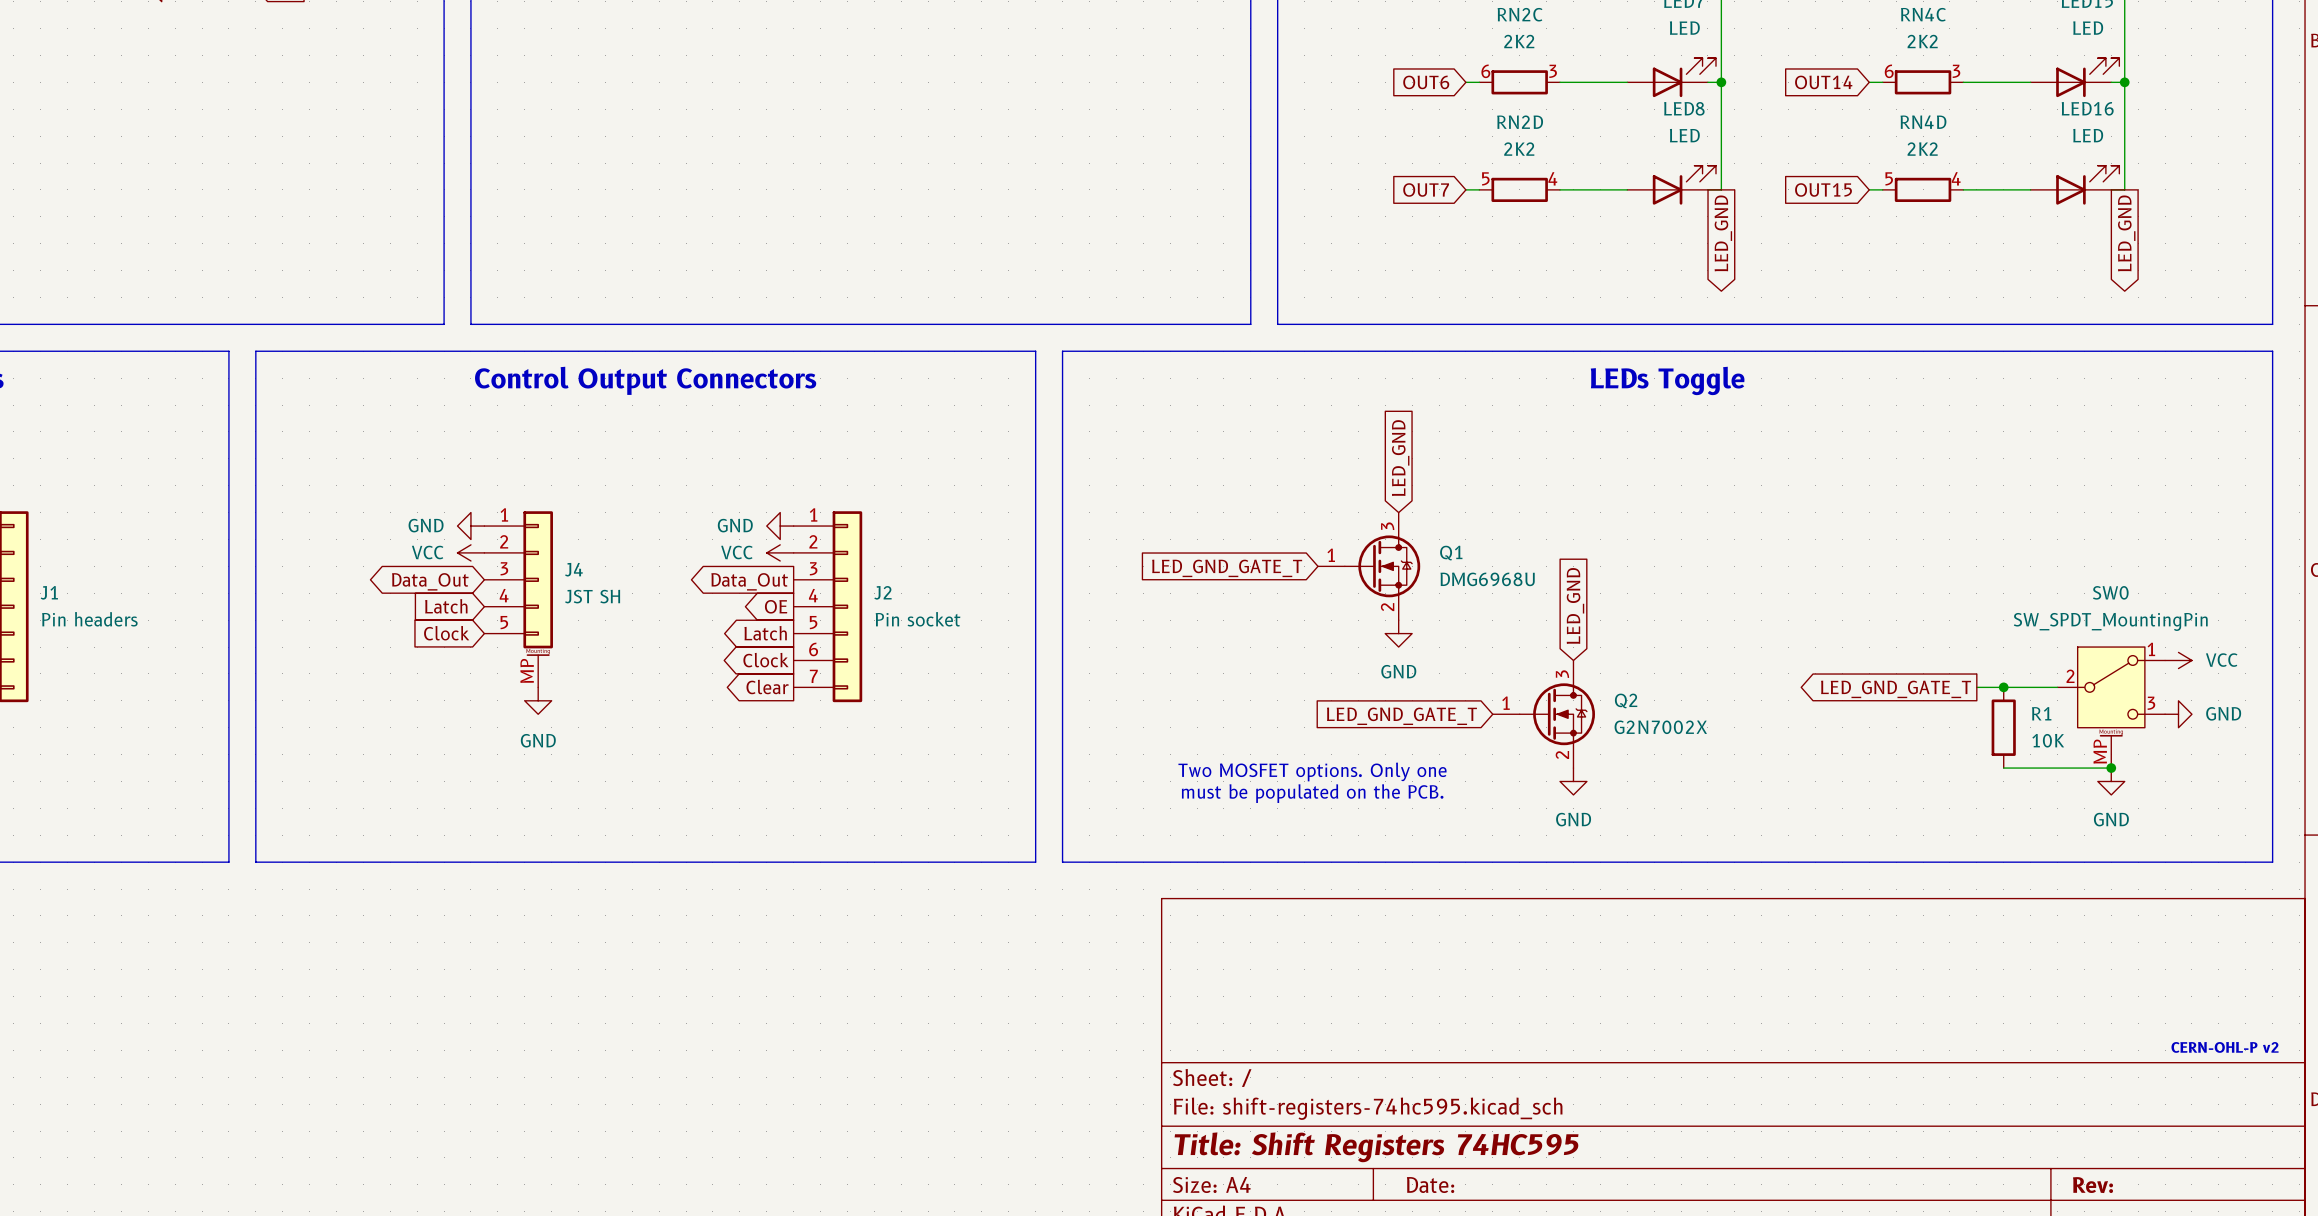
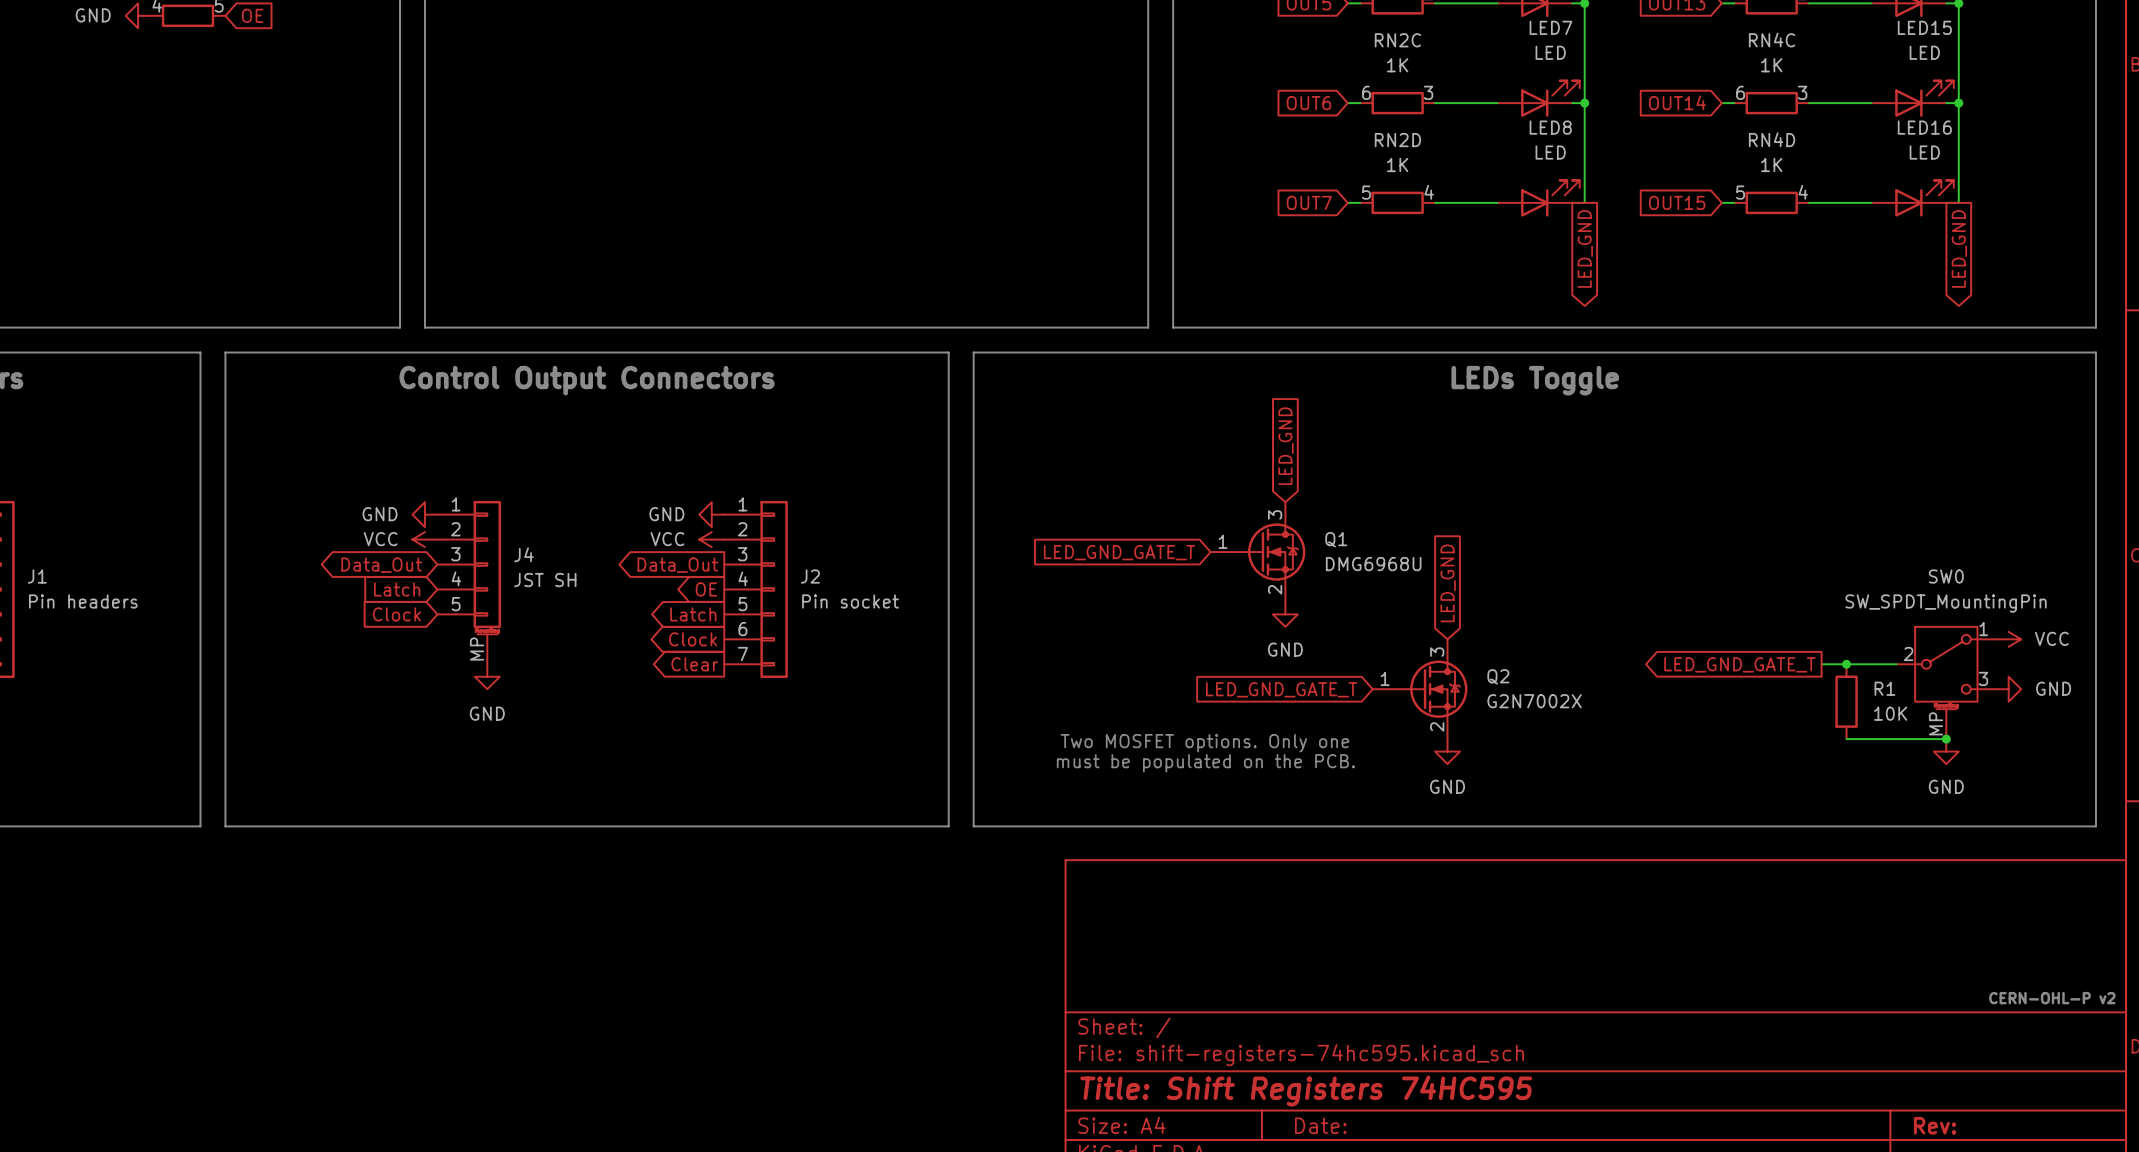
RN2C value: 2K2 (1519, 41) -> 1K (1397, 65)
RN4C value: 2K2 (1922, 41) -> 1K (1771, 65)
RN2D value: 2K2 (1519, 149) -> 1K (1397, 165)
RN4D value: 2K2 (1922, 149) -> 1K (1771, 165)

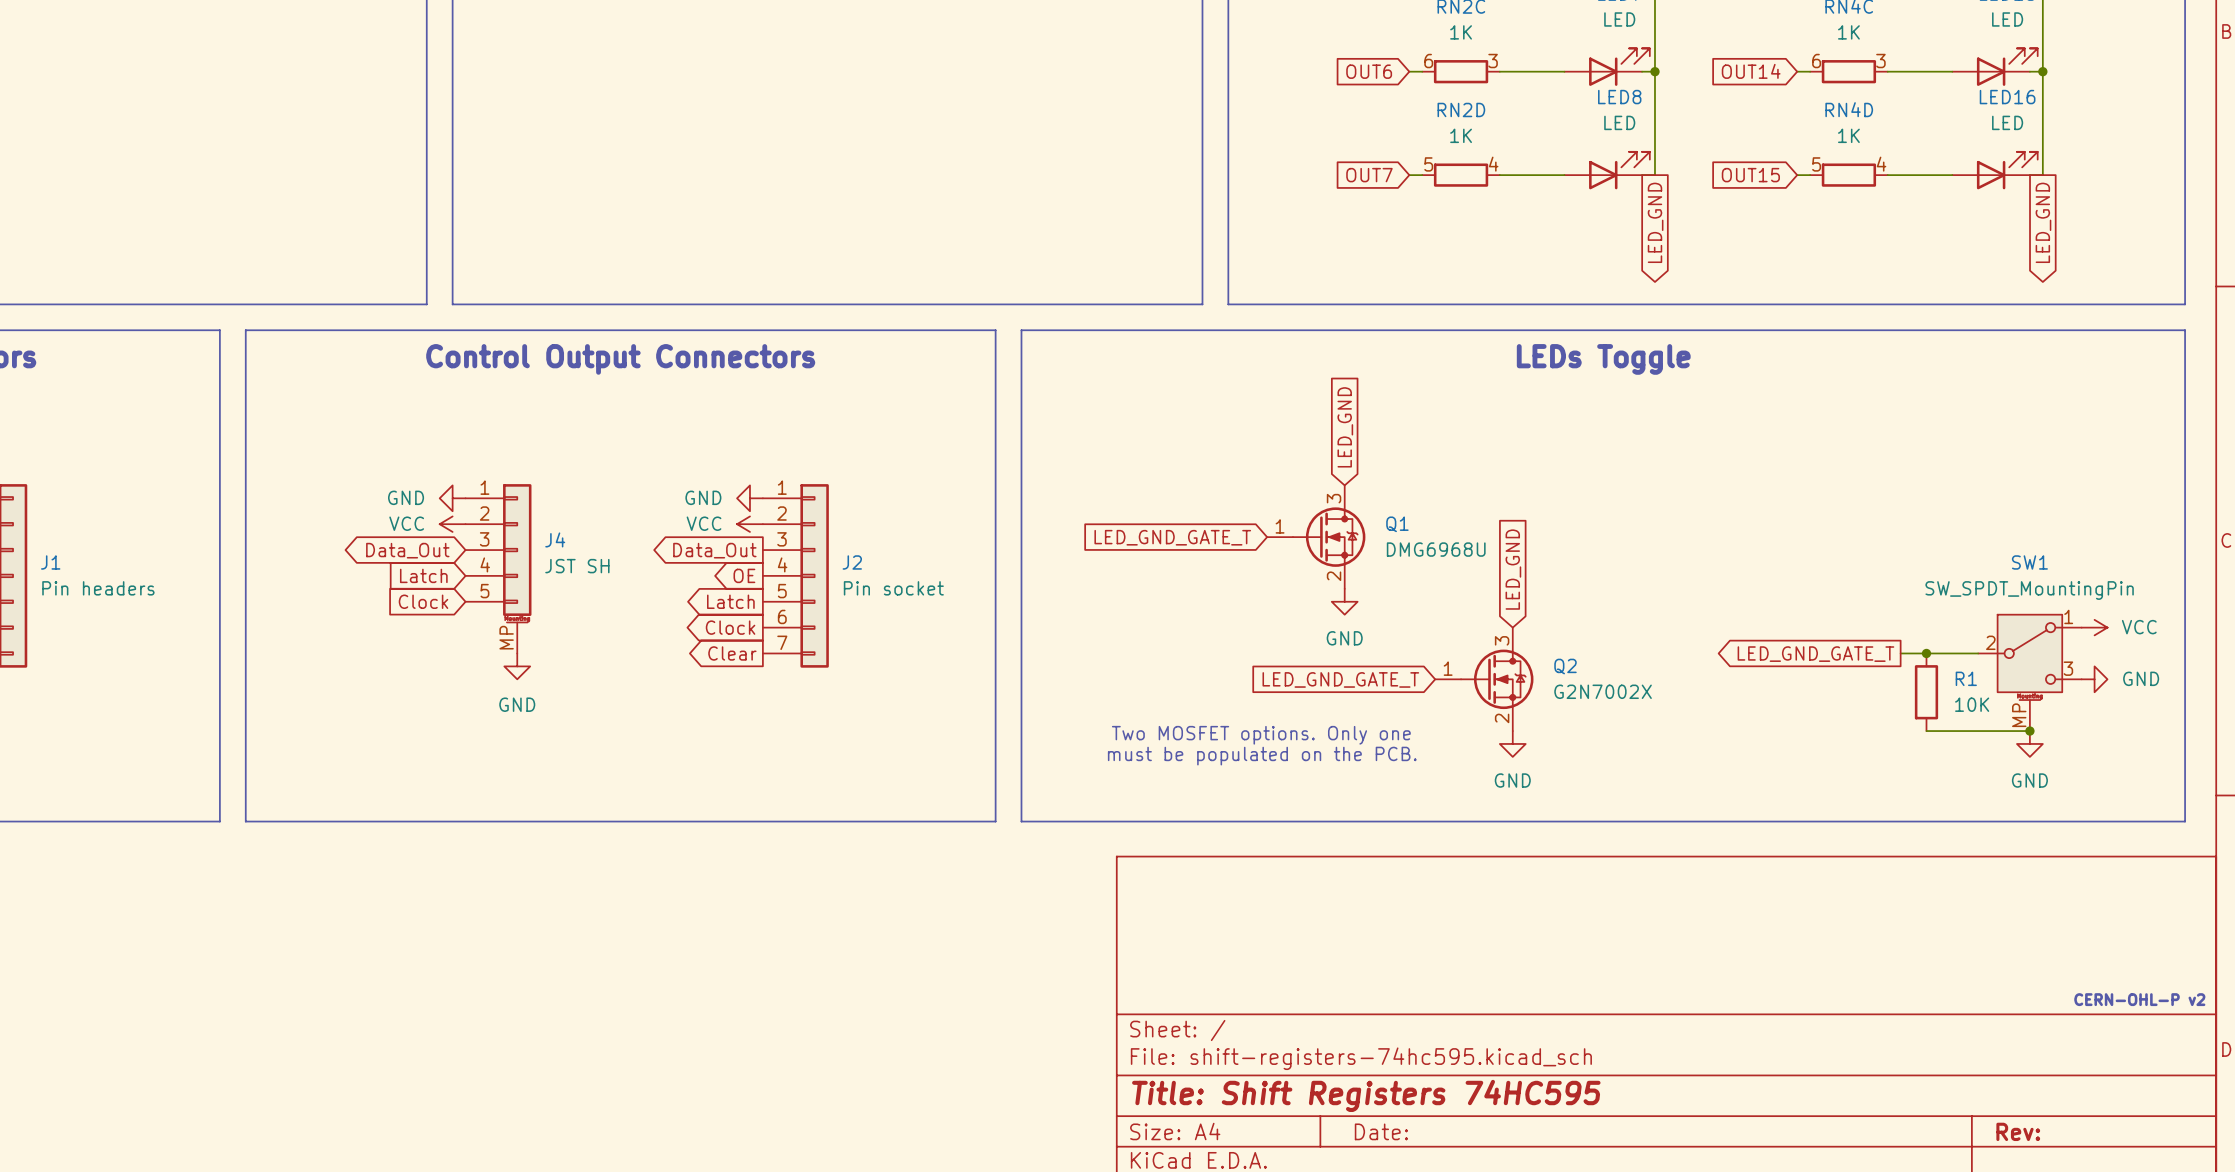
SW0 name: SW0 (1946, 576) -> SW1 (2029, 562)

